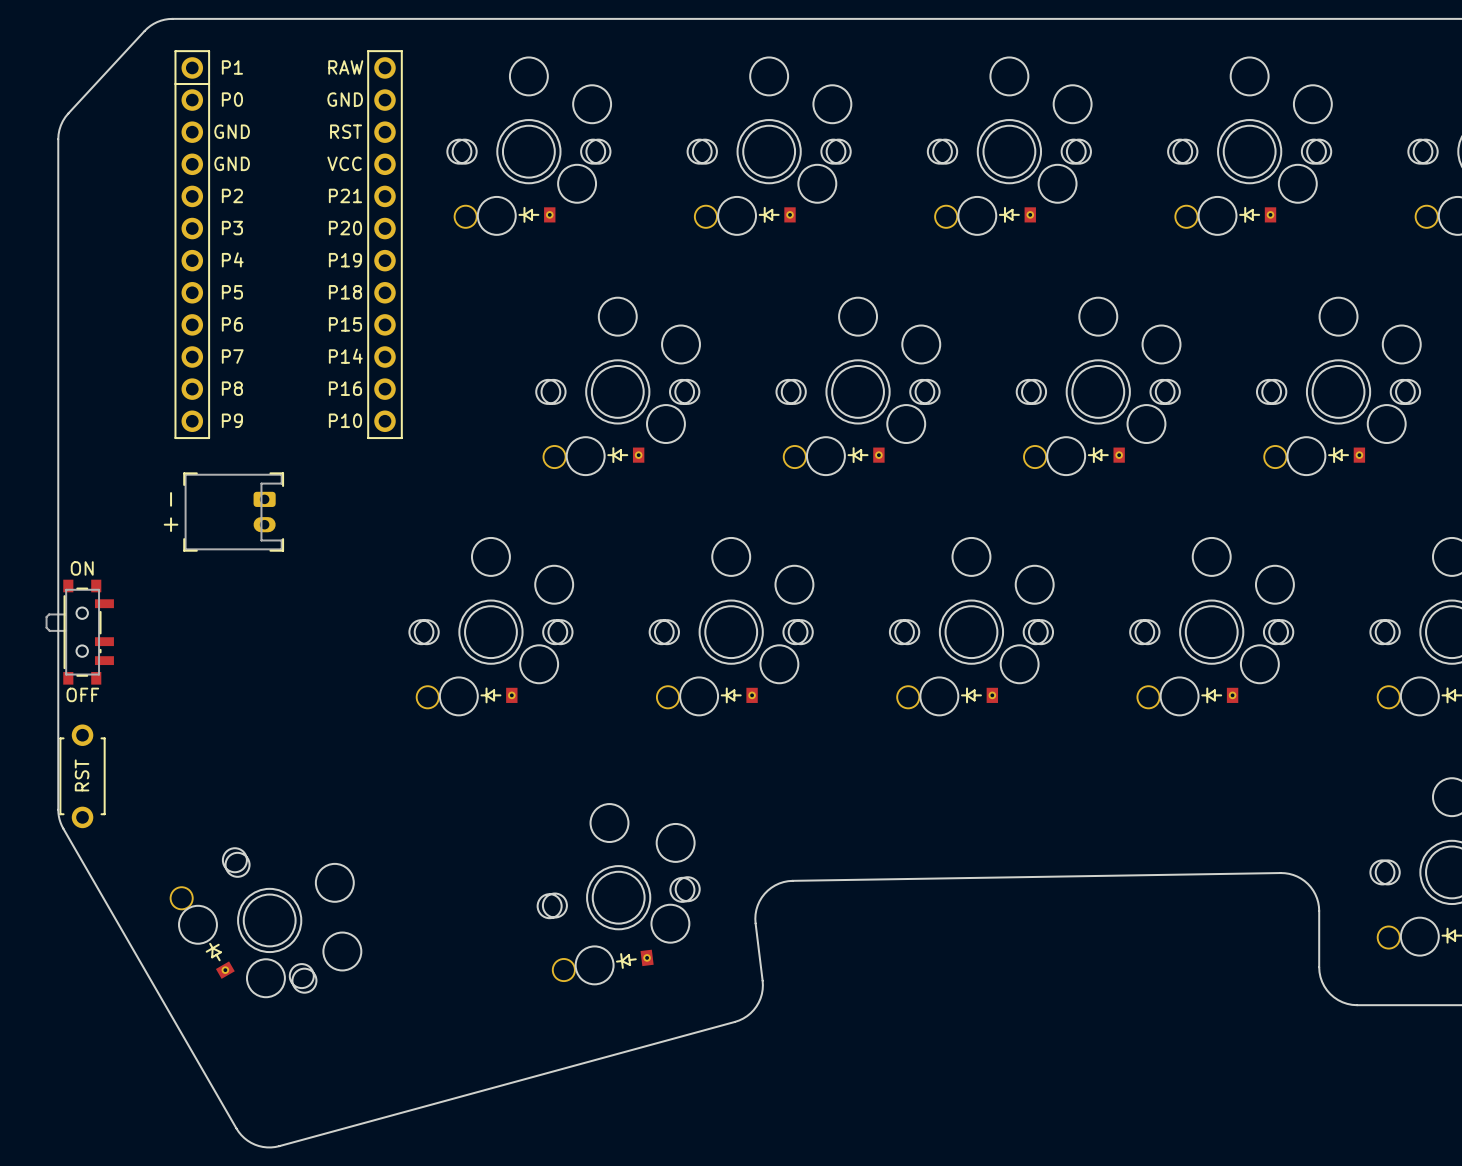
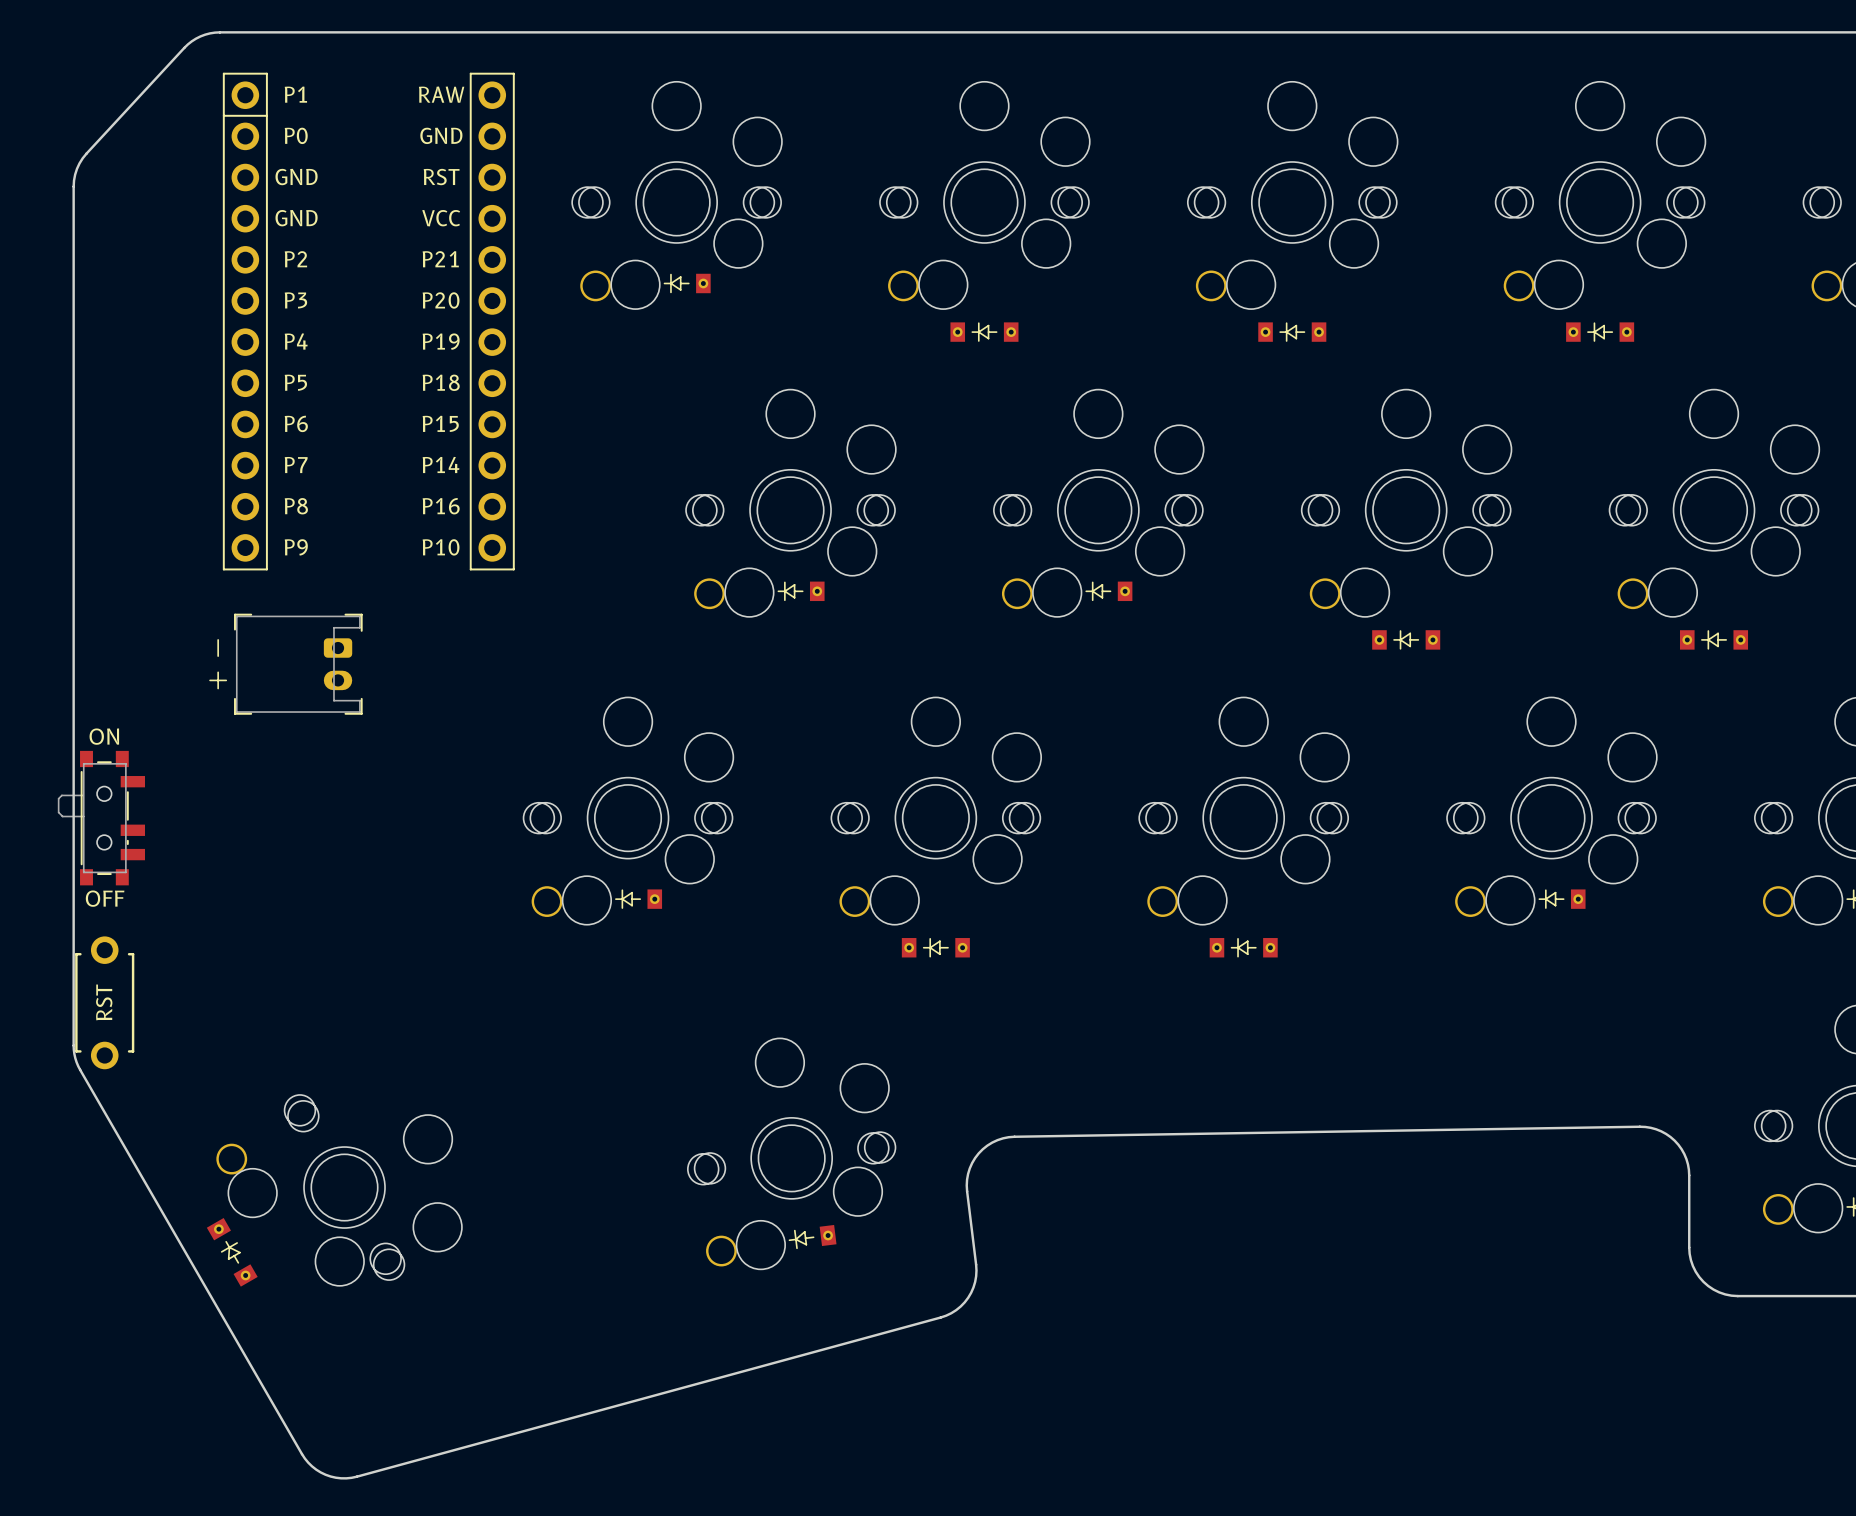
part position: (769, 214) -> (984, 332)
part position: (1009, 214) -> (1292, 332)
part position: (1249, 214) -> (1600, 332)
part position: (1098, 455) -> (1406, 639)
part position: (1338, 455) -> (1714, 639)
part position: (731, 695) -> (935, 947)
part position: (971, 695) -> (1243, 947)
part position: (214, 952) -> (232, 1252)

